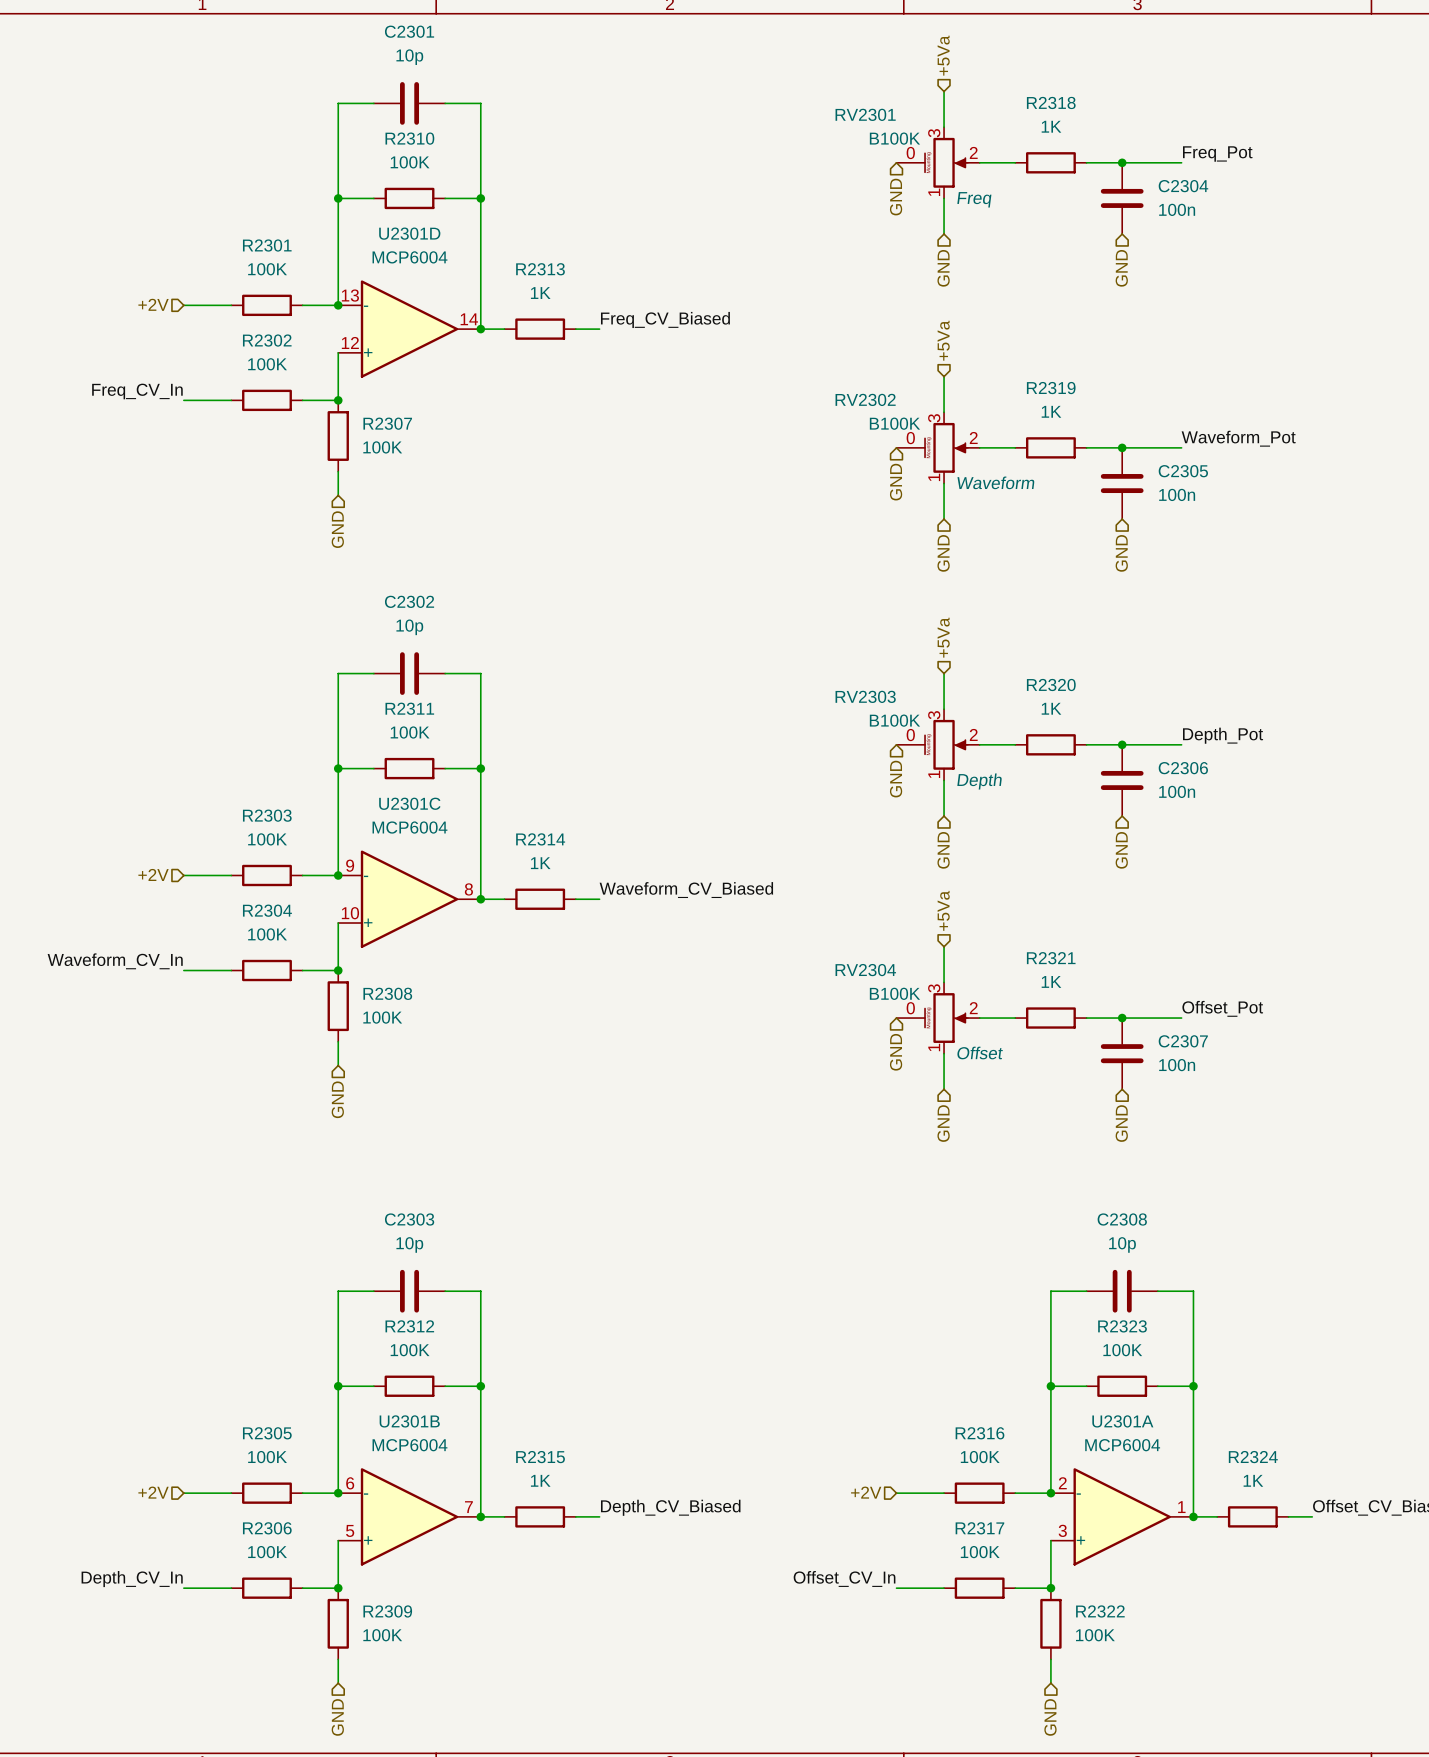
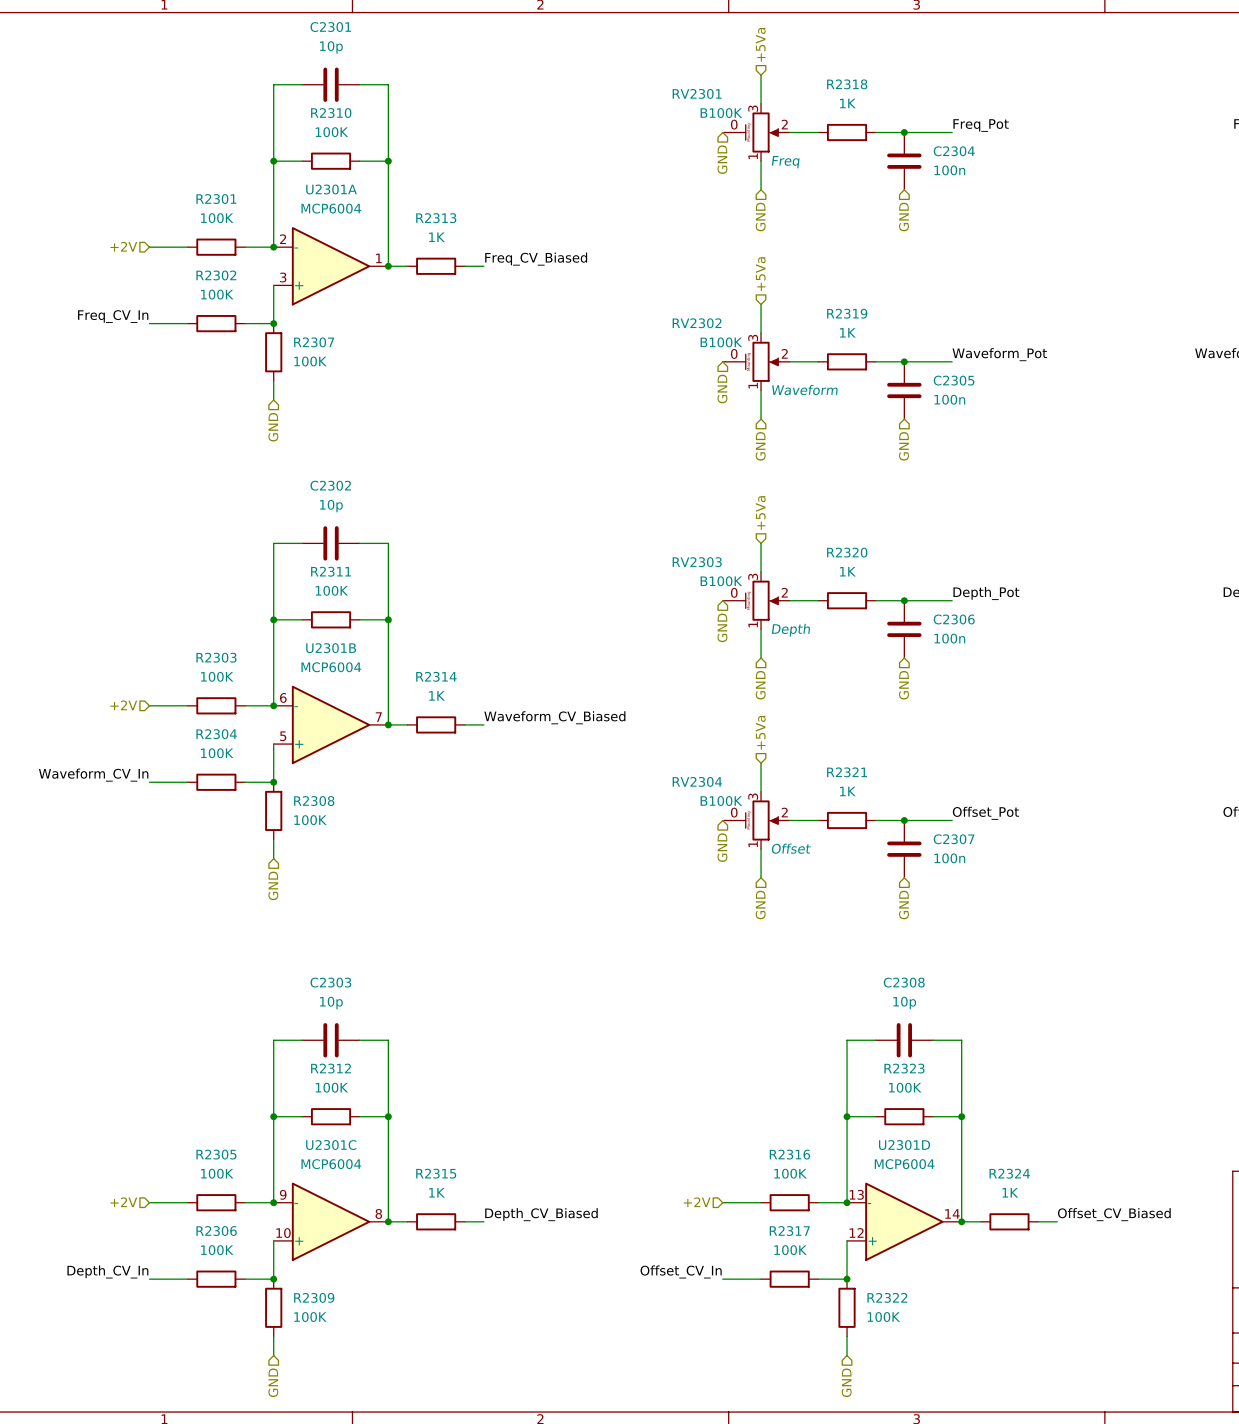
U2301D position: (409, 329) -> (904, 1221)
U2301C position: (409, 899) -> (331, 1221)
U2301B position: (409, 1516) -> (331, 724)
U2301A position: (1122, 1516) -> (331, 266)

